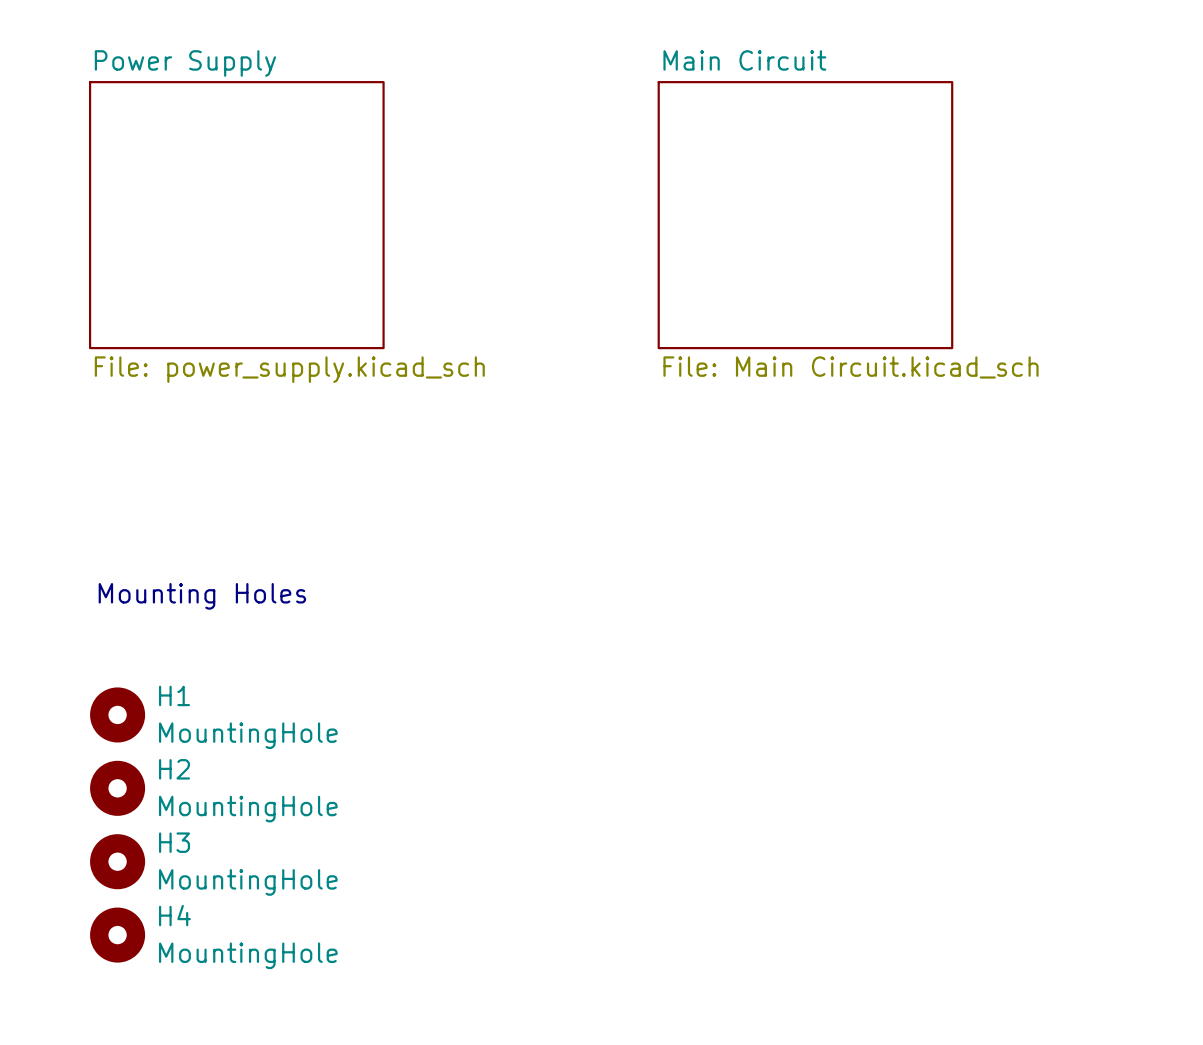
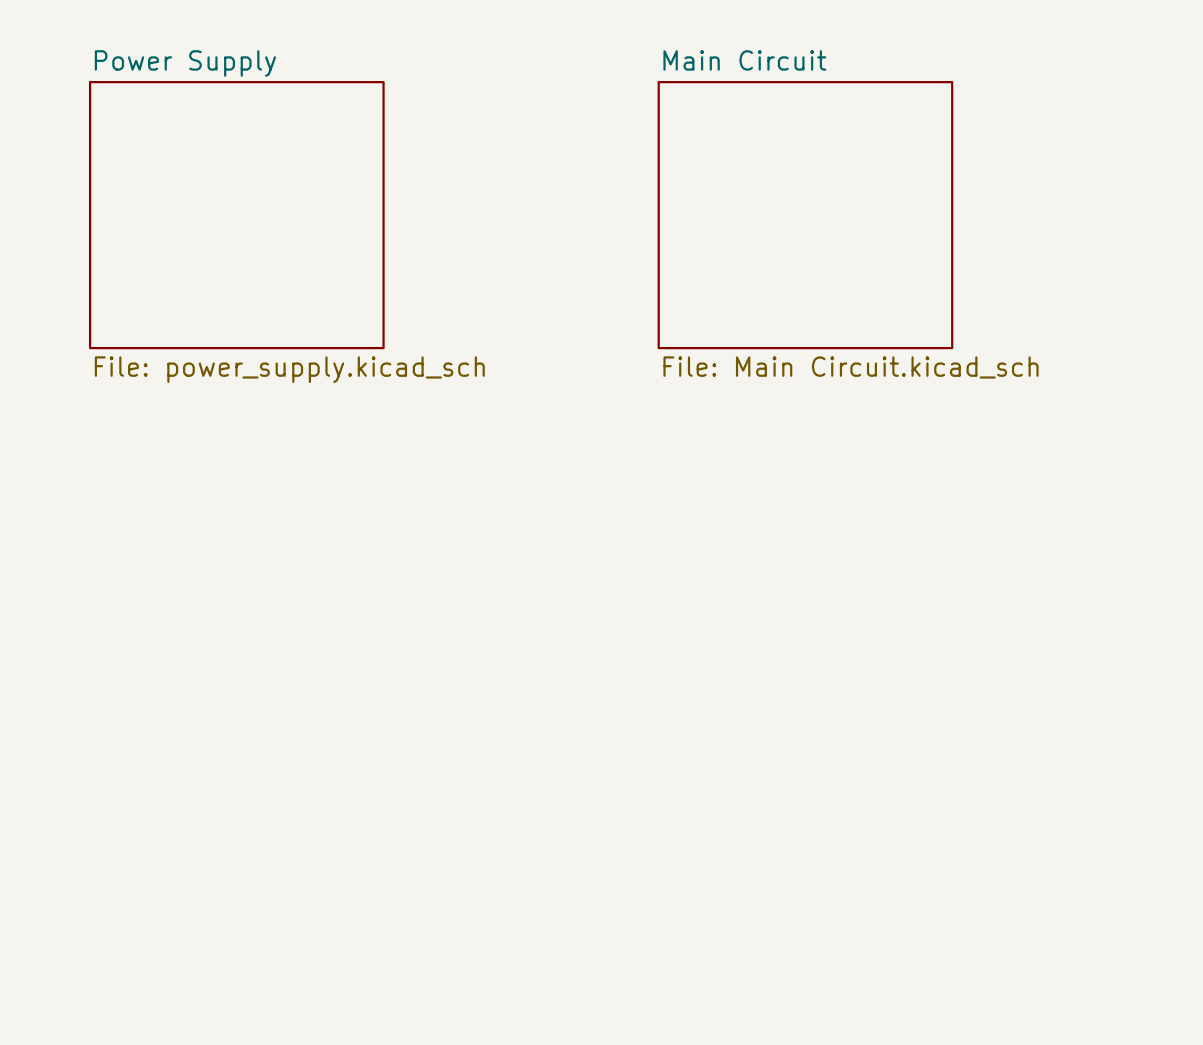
text: Mounting Holes (202, 596) -> none
H1: MountingHole (117, 714) -> none
H2: MountingHole (117, 788) -> none
H3: MountingHole (117, 861) -> none
H4: MountingHole (117, 935) -> none

